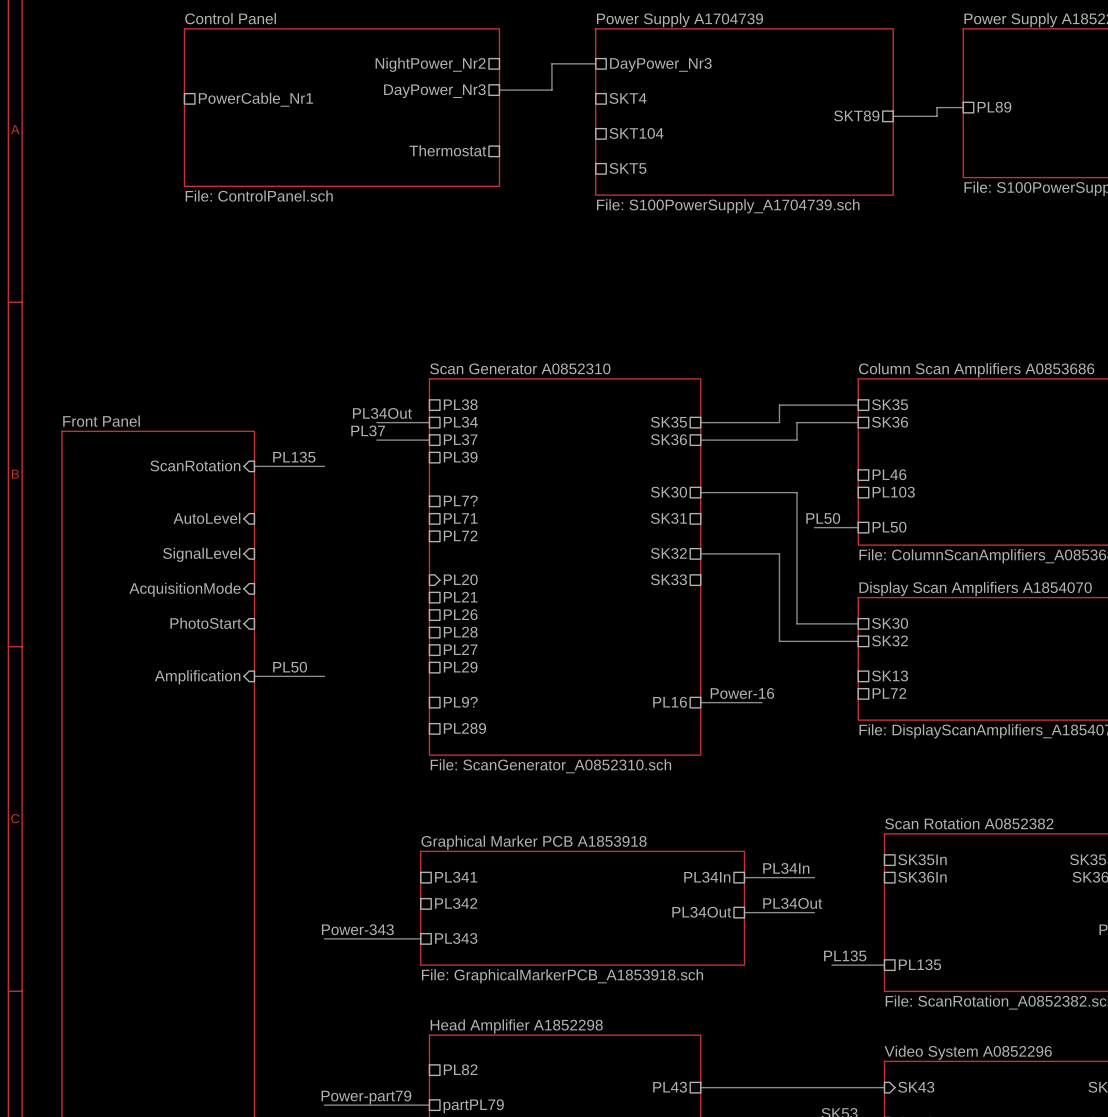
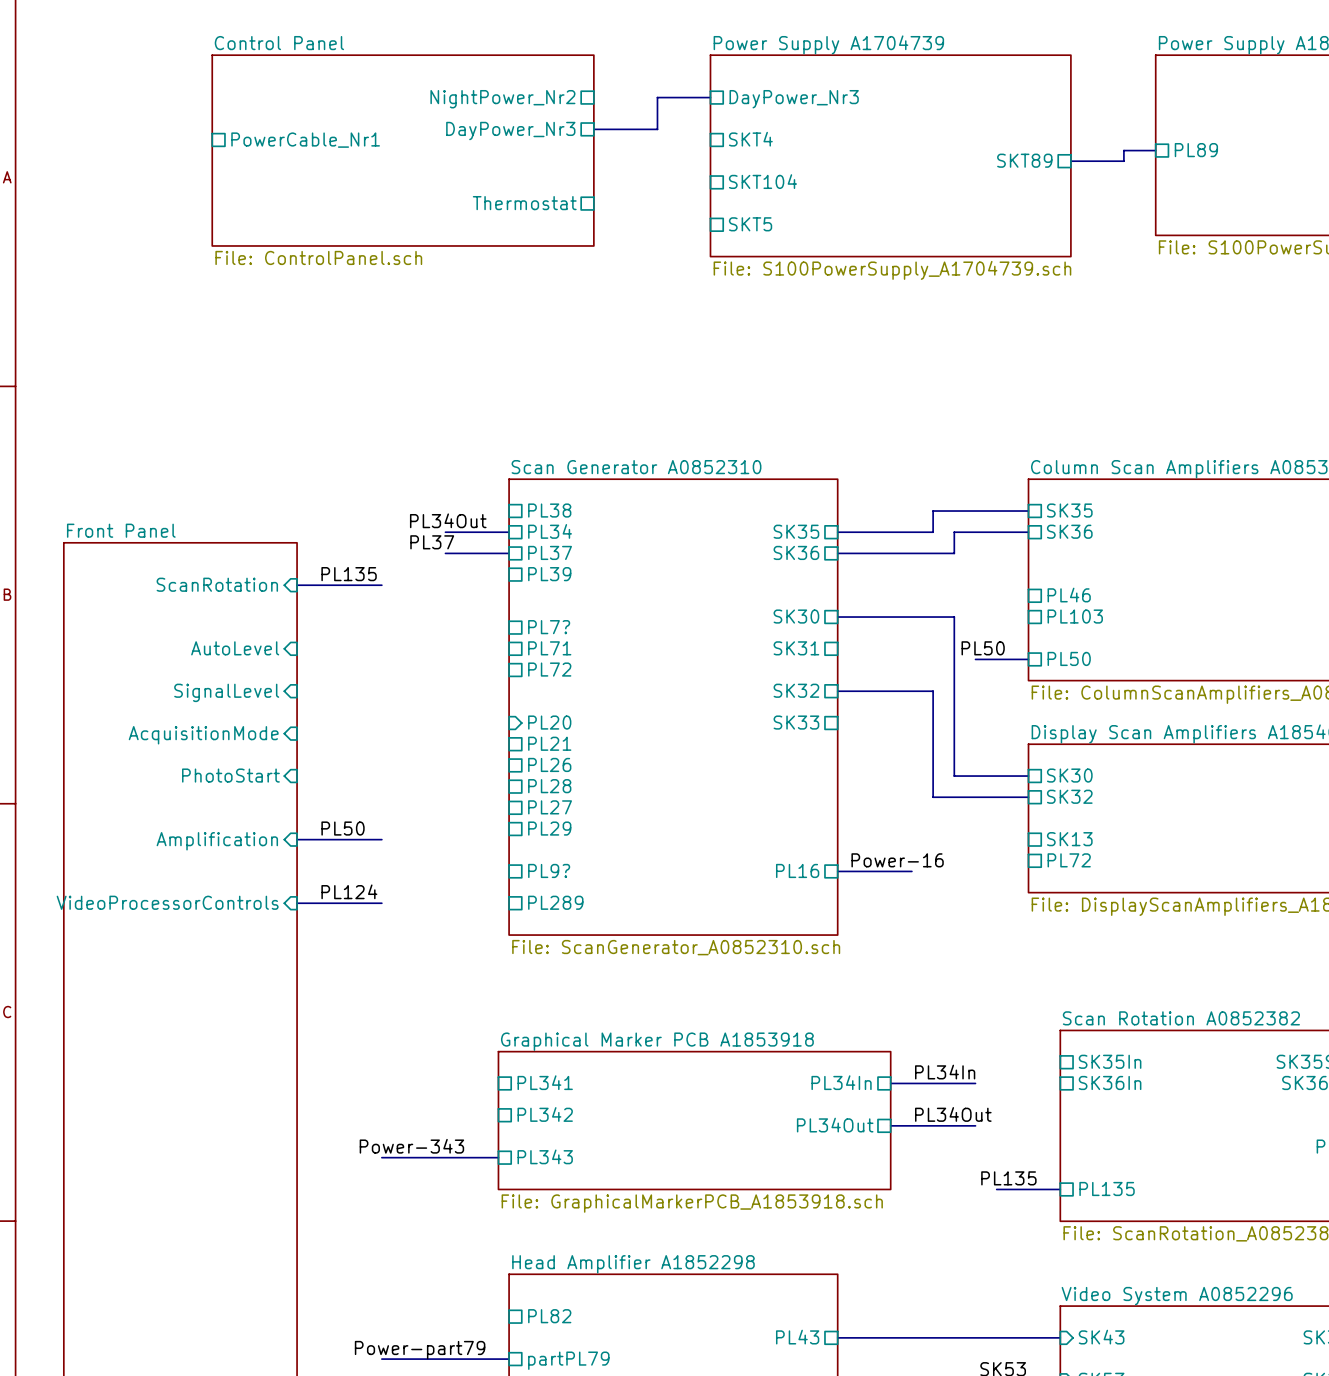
label: none -> PL124 (349, 891)
sheet pin: none -> VideoProcessorControls (167, 902)
bus: none -> (297, 903) (381, 903)

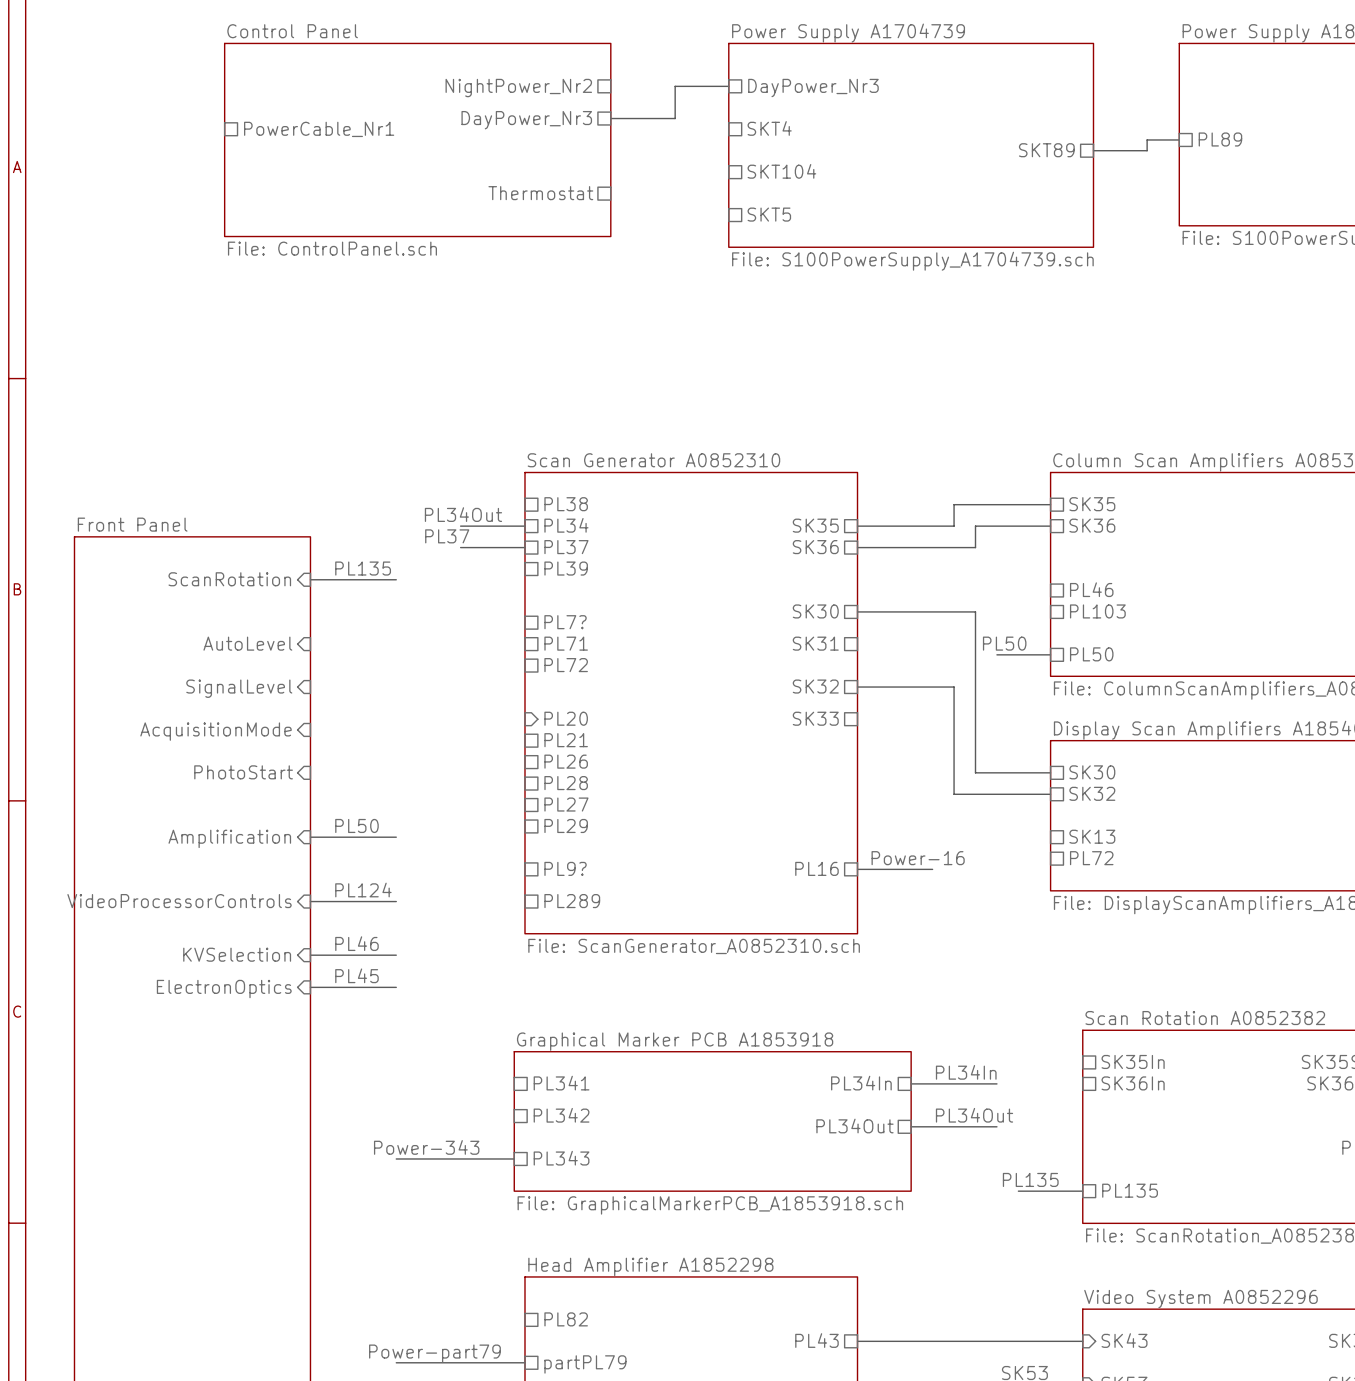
label: none -> PL46 (356, 943)
sheet pin: none -> KVSelection (237, 954)
bus: none -> (310, 955) (396, 955)
label: none -> PL45 (356, 975)
bus: none -> (310, 987) (396, 987)
sheet pin: none -> ElectronOptics (224, 989)

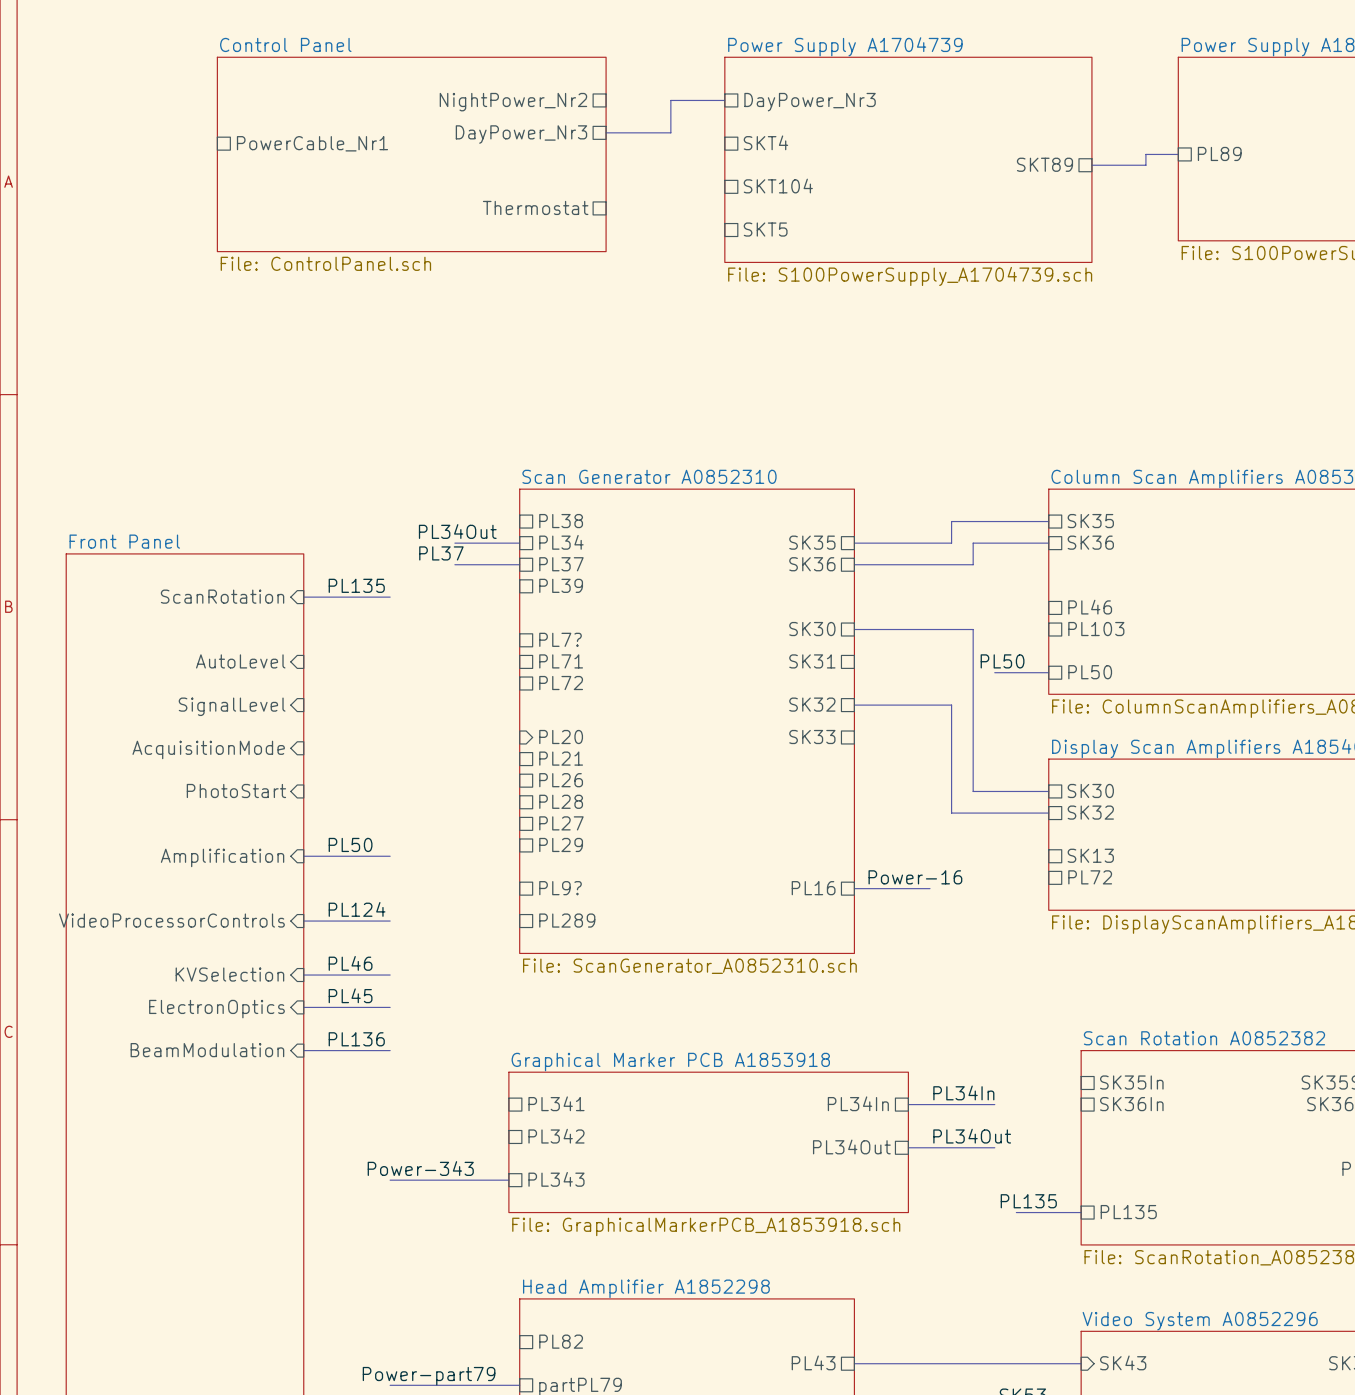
label: none -> PL136 (356, 1039)
sheet pin: none -> BeamModulation (207, 1050)
bus: none -> (303, 1050) (390, 1050)

